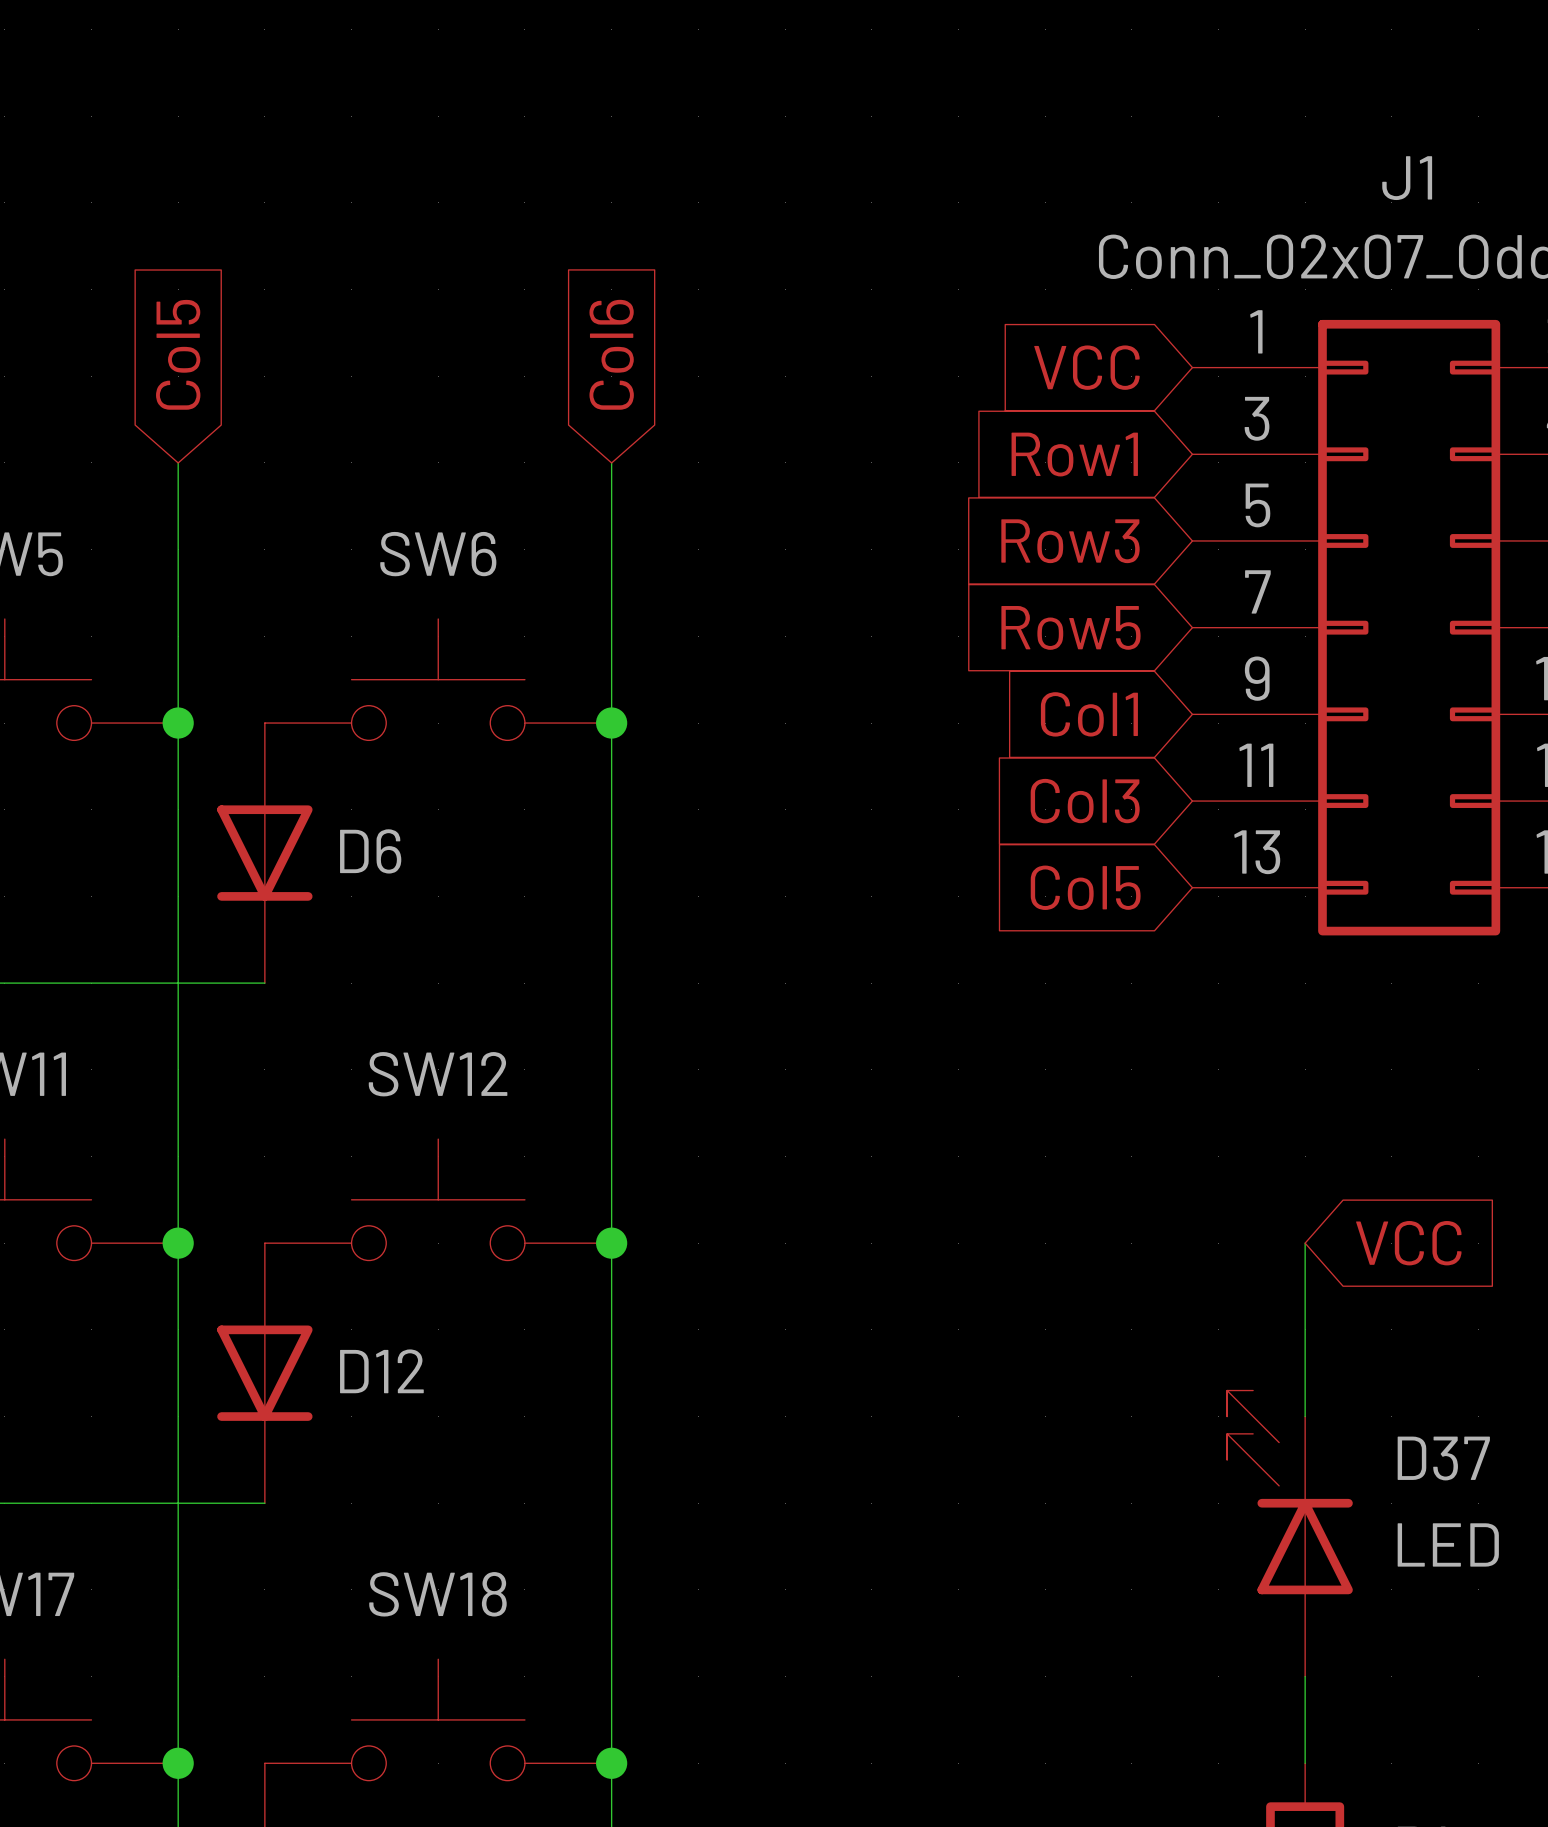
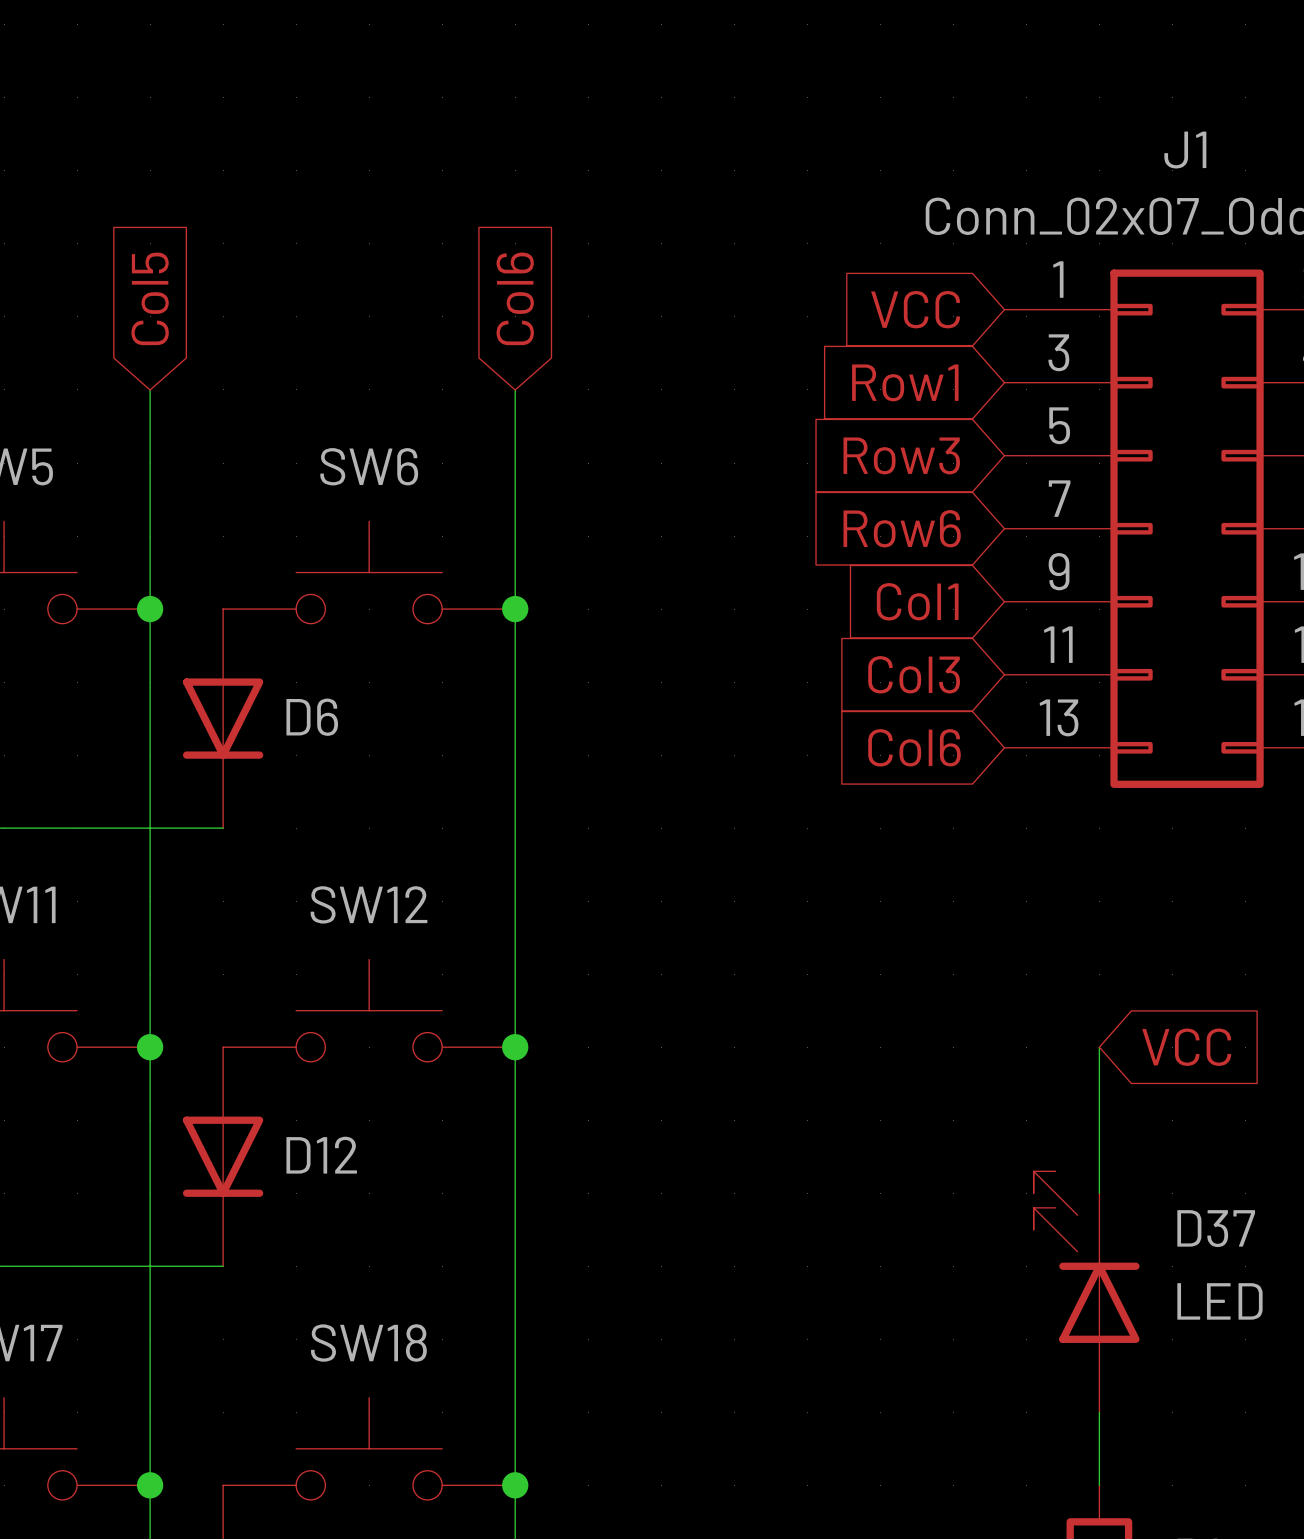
global label: Row5 (1070, 627) -> Row6 (902, 528)
global label: Col5 (1085, 887) -> Col6 (914, 747)

